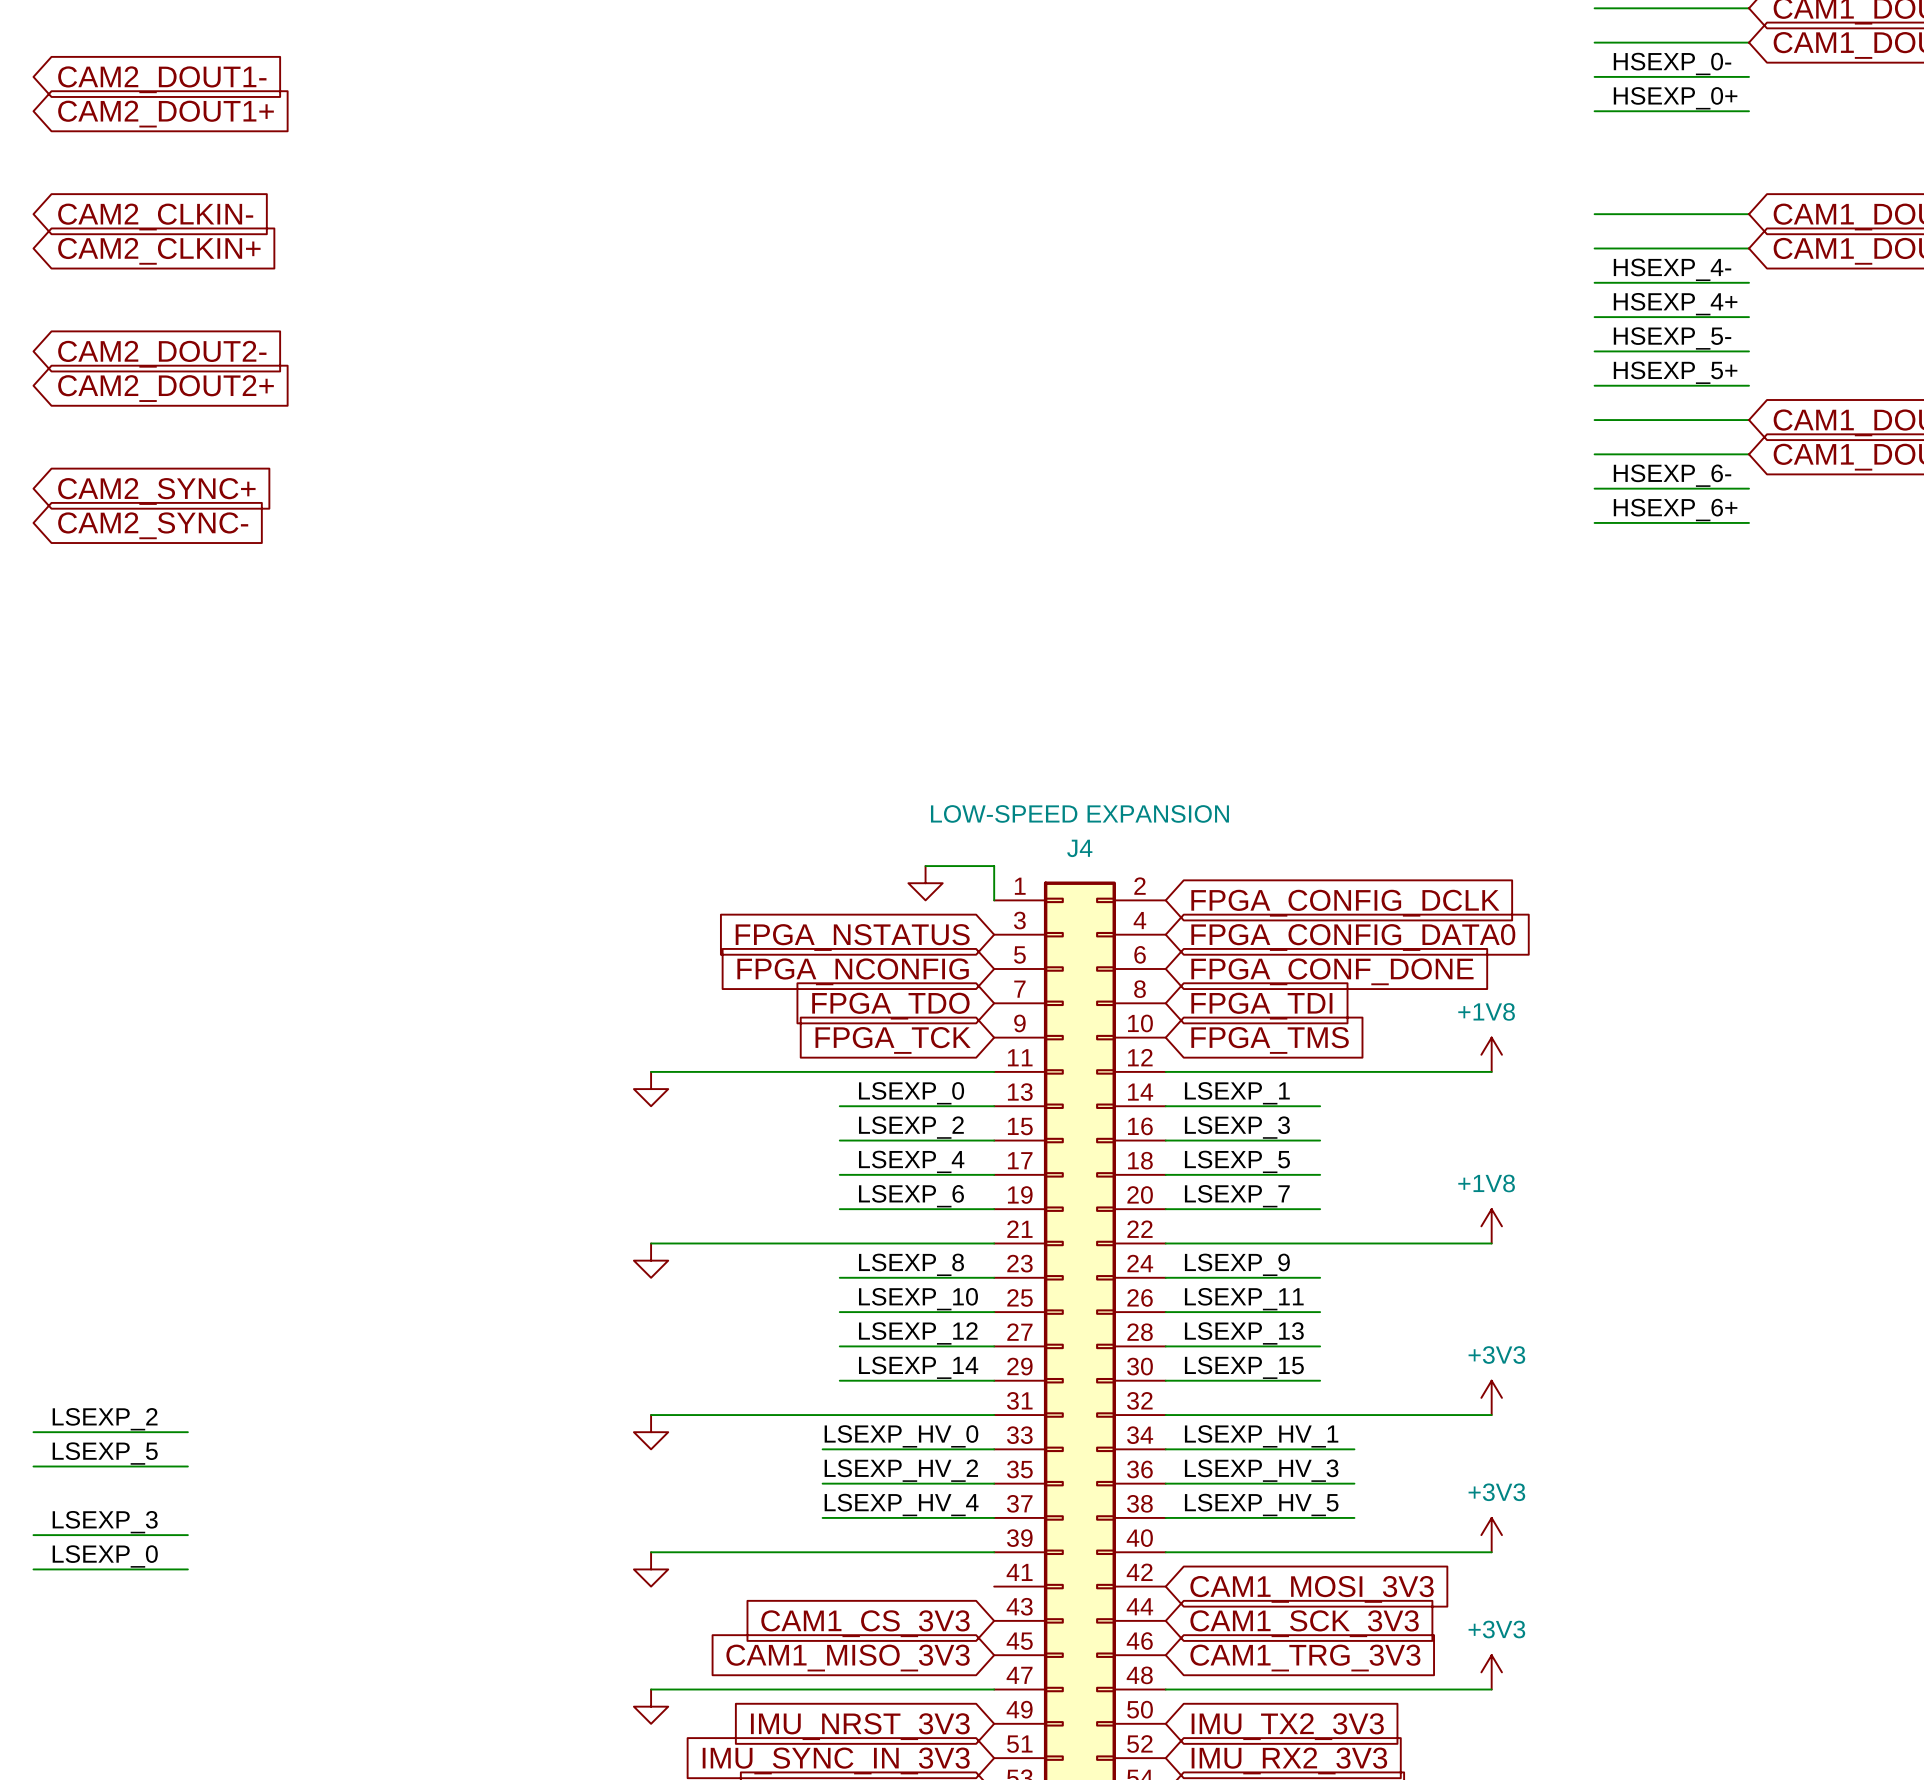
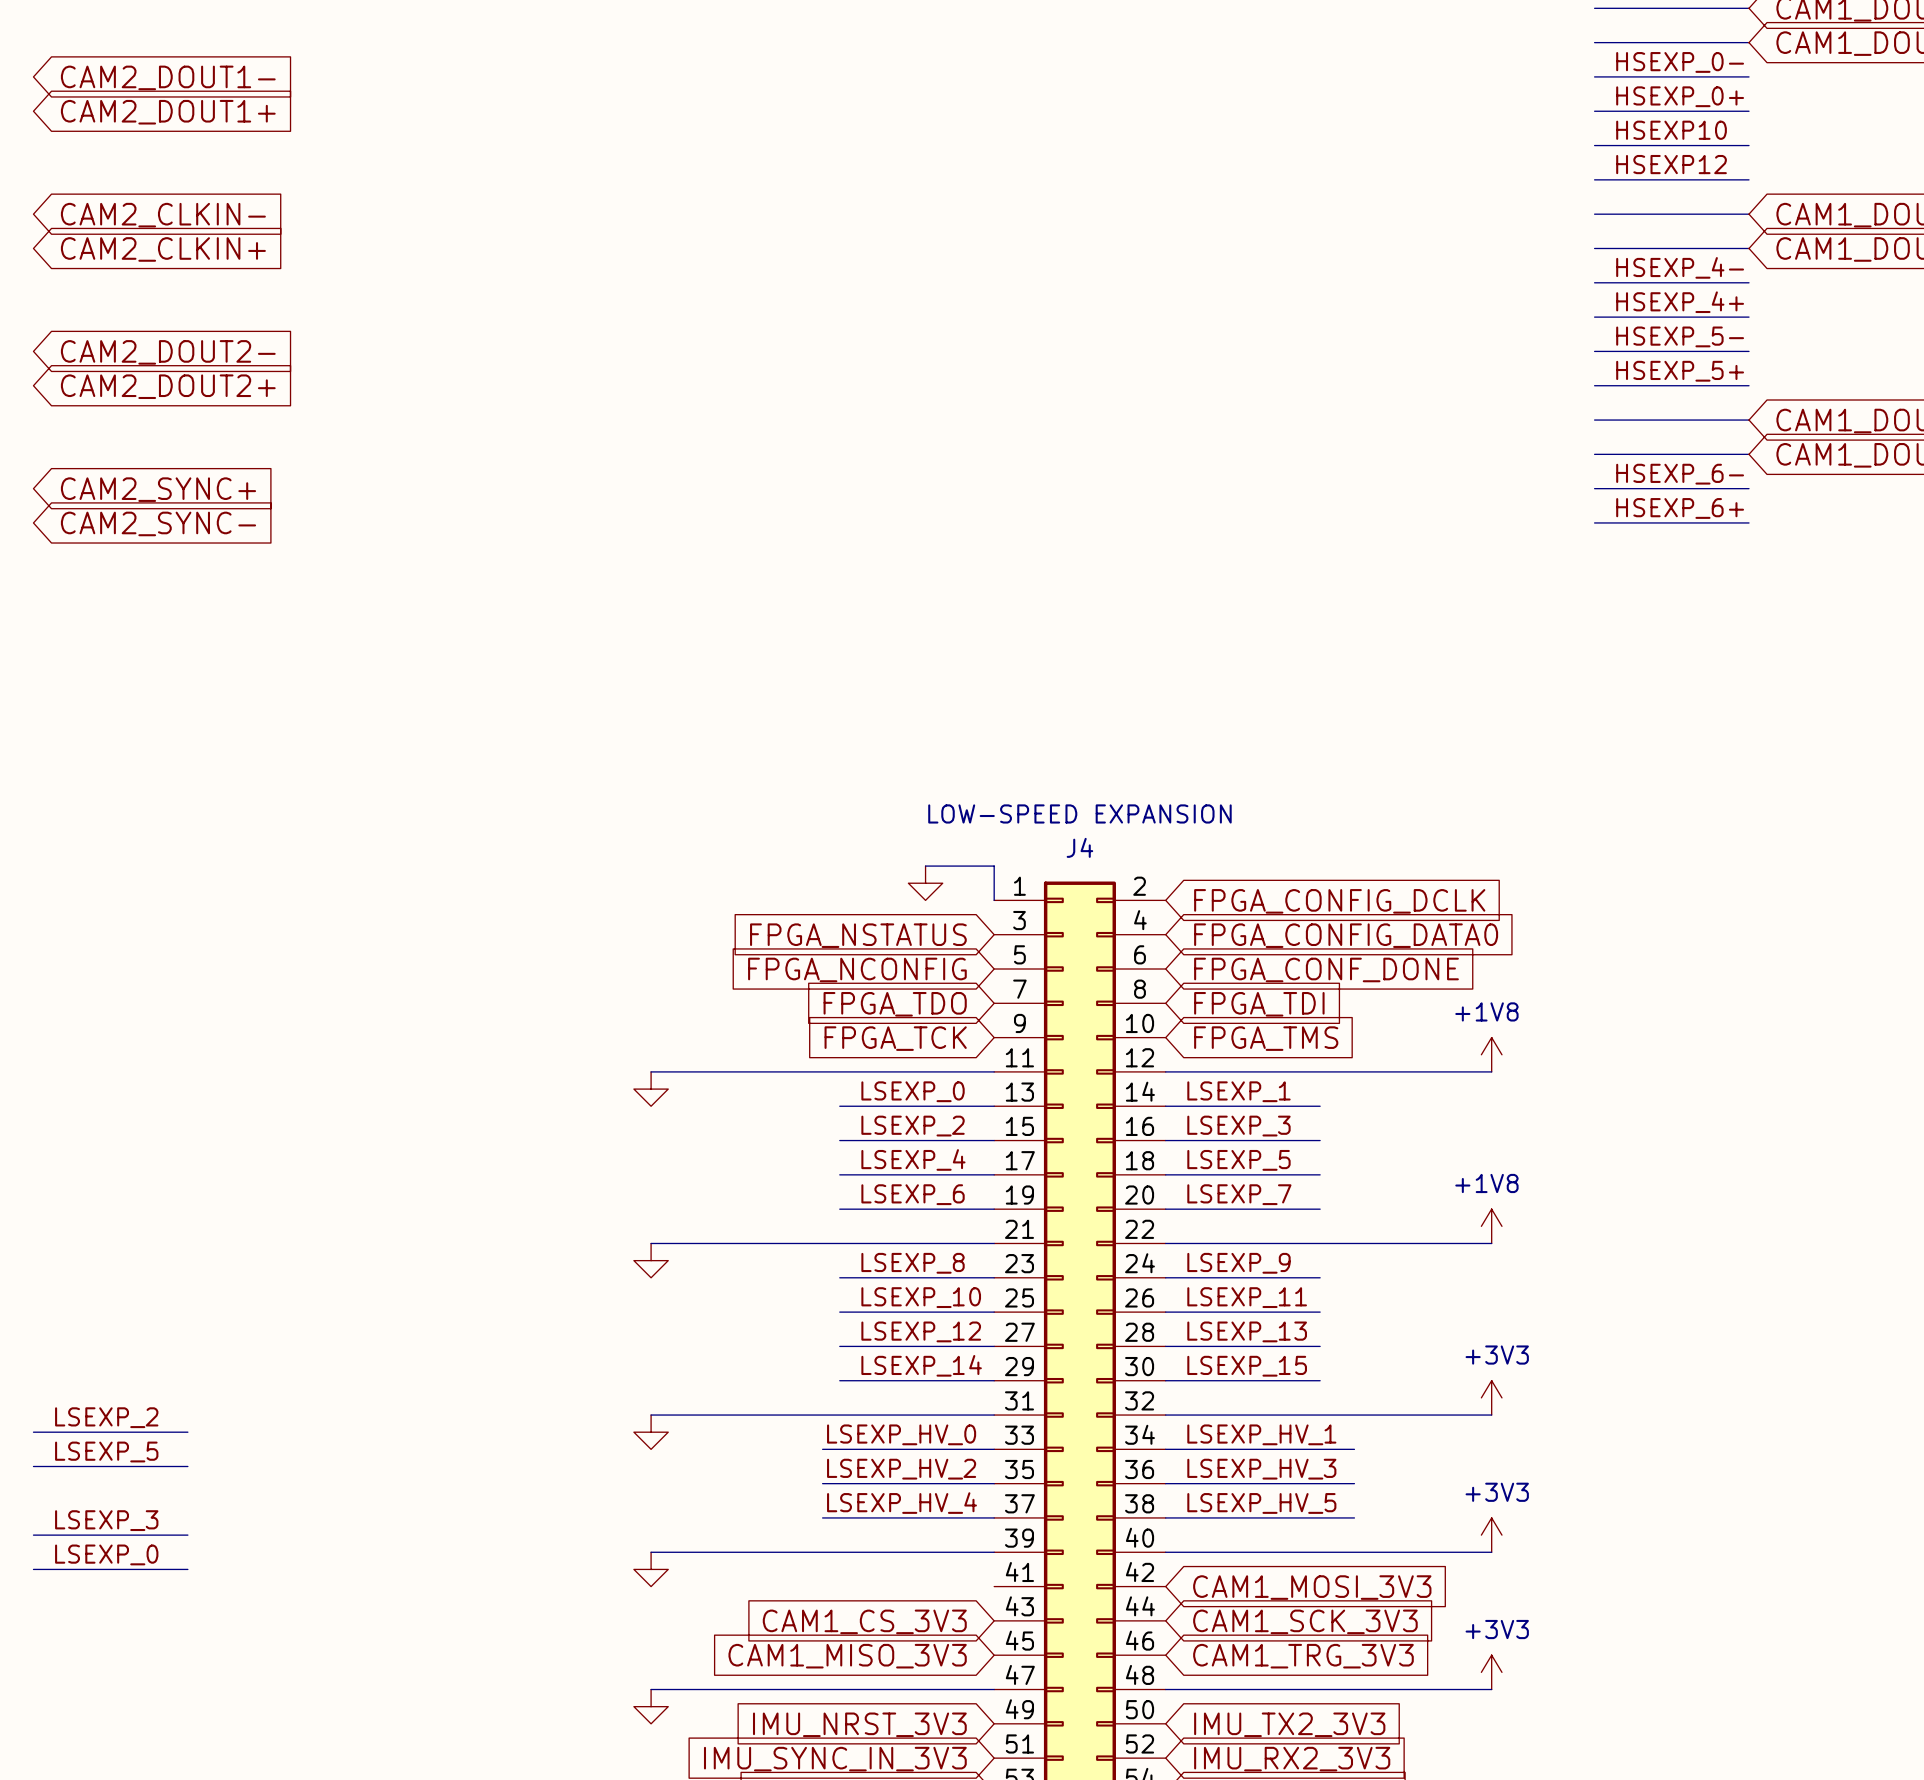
label: none -> HSEXP10 (1671, 130)
wire: none -> (1594, 145) (1749, 145)
label: none -> HSEXP12 (1671, 164)
wire: none -> (1594, 179) (1749, 179)

